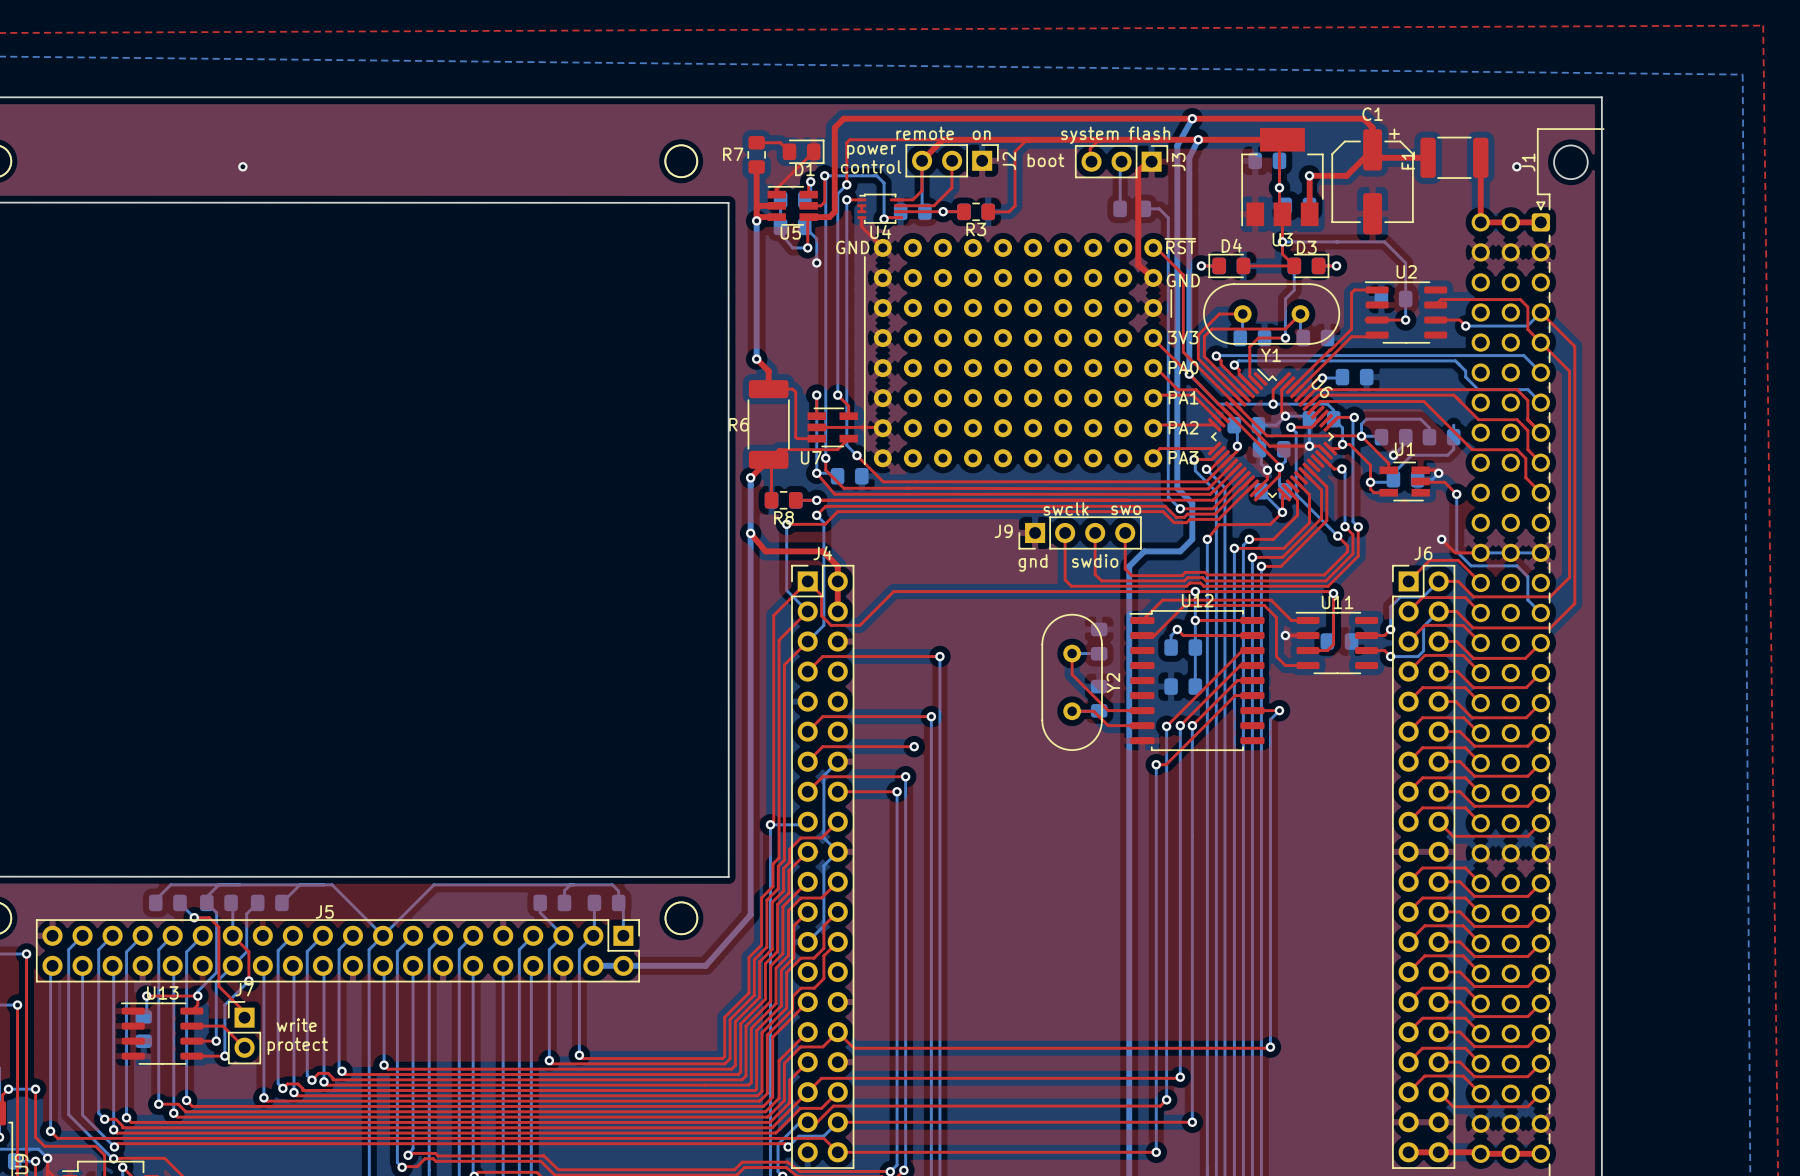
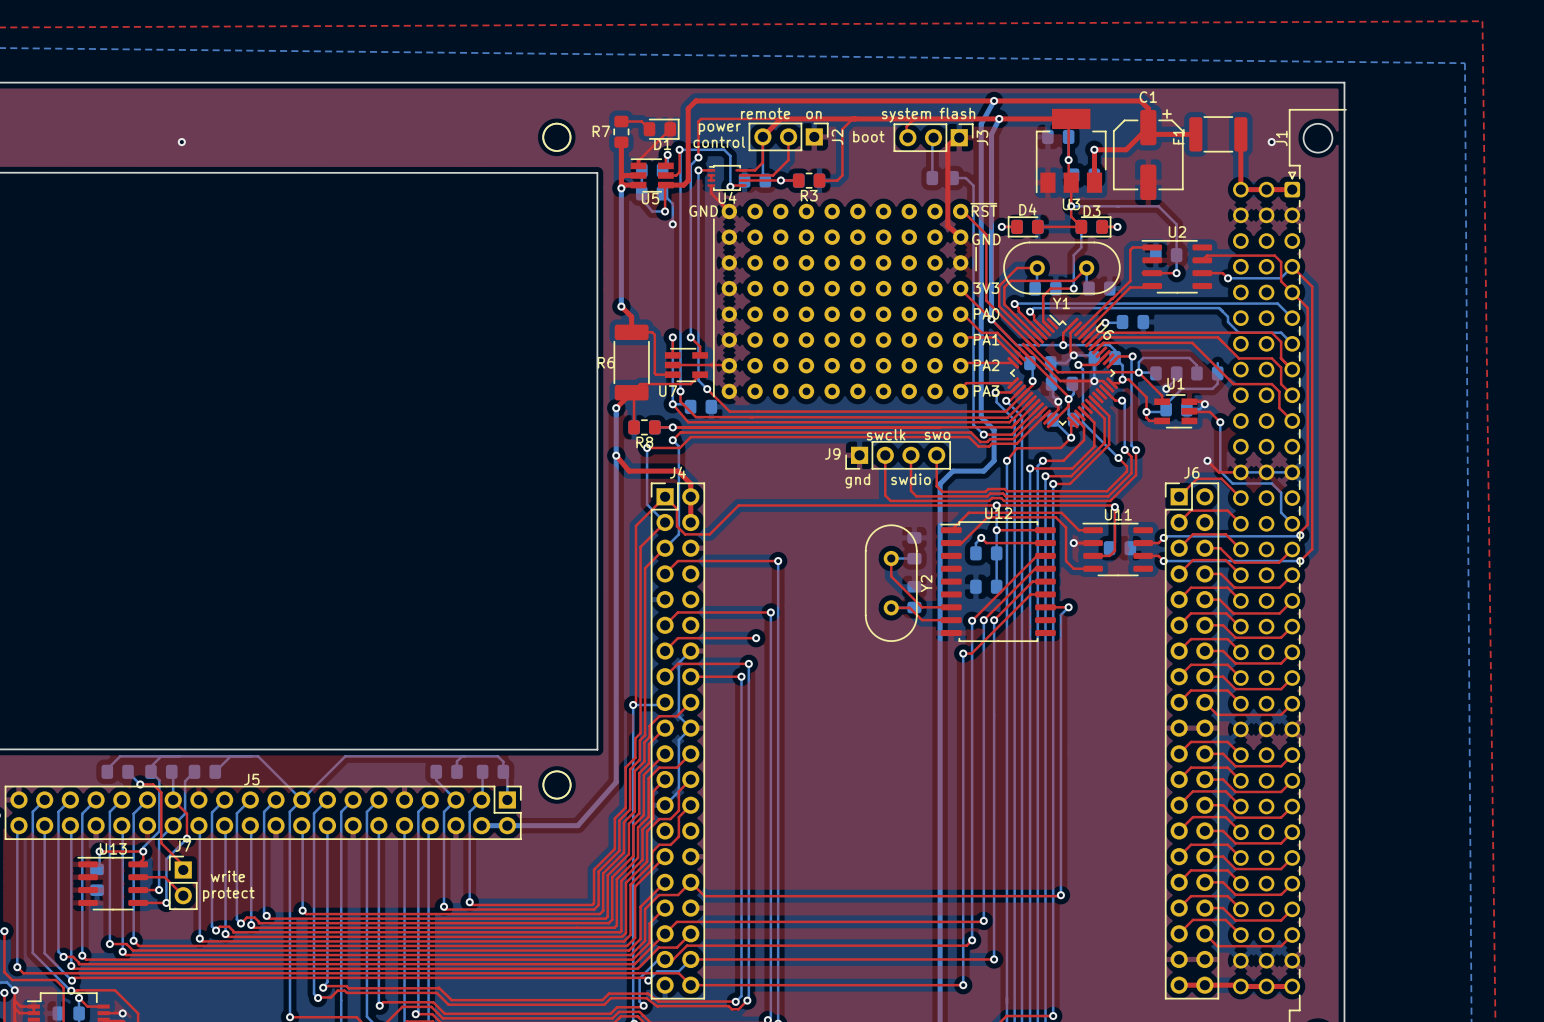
top track: (1564, 335) (1574, 346) (1574, 603) (1550, 627) (1473, 627) (1456, 611) (1438, 611) -> (1312, 286) (1312, 549) (1300, 561)
top track: (1558, 360) (1569, 371) (1569, 577) (1550, 596) (1473, 596) (1458, 581) (1438, 581) -> (1307, 307) (1307, 524) (1299, 532) (1300, 535)
bottom track: (1438, 581) (1422, 597) (1400, 597) (1390, 606) (1390, 629) -> none
bottom track: (1438, 611) (1423, 626) (1423, 650) (1418, 656) -> (1300, 561) (1187, 561)
bottom track: none -> (1300, 535) (1165, 536)
via: none -> (1300, 535)
via: none -> (1300, 561)

